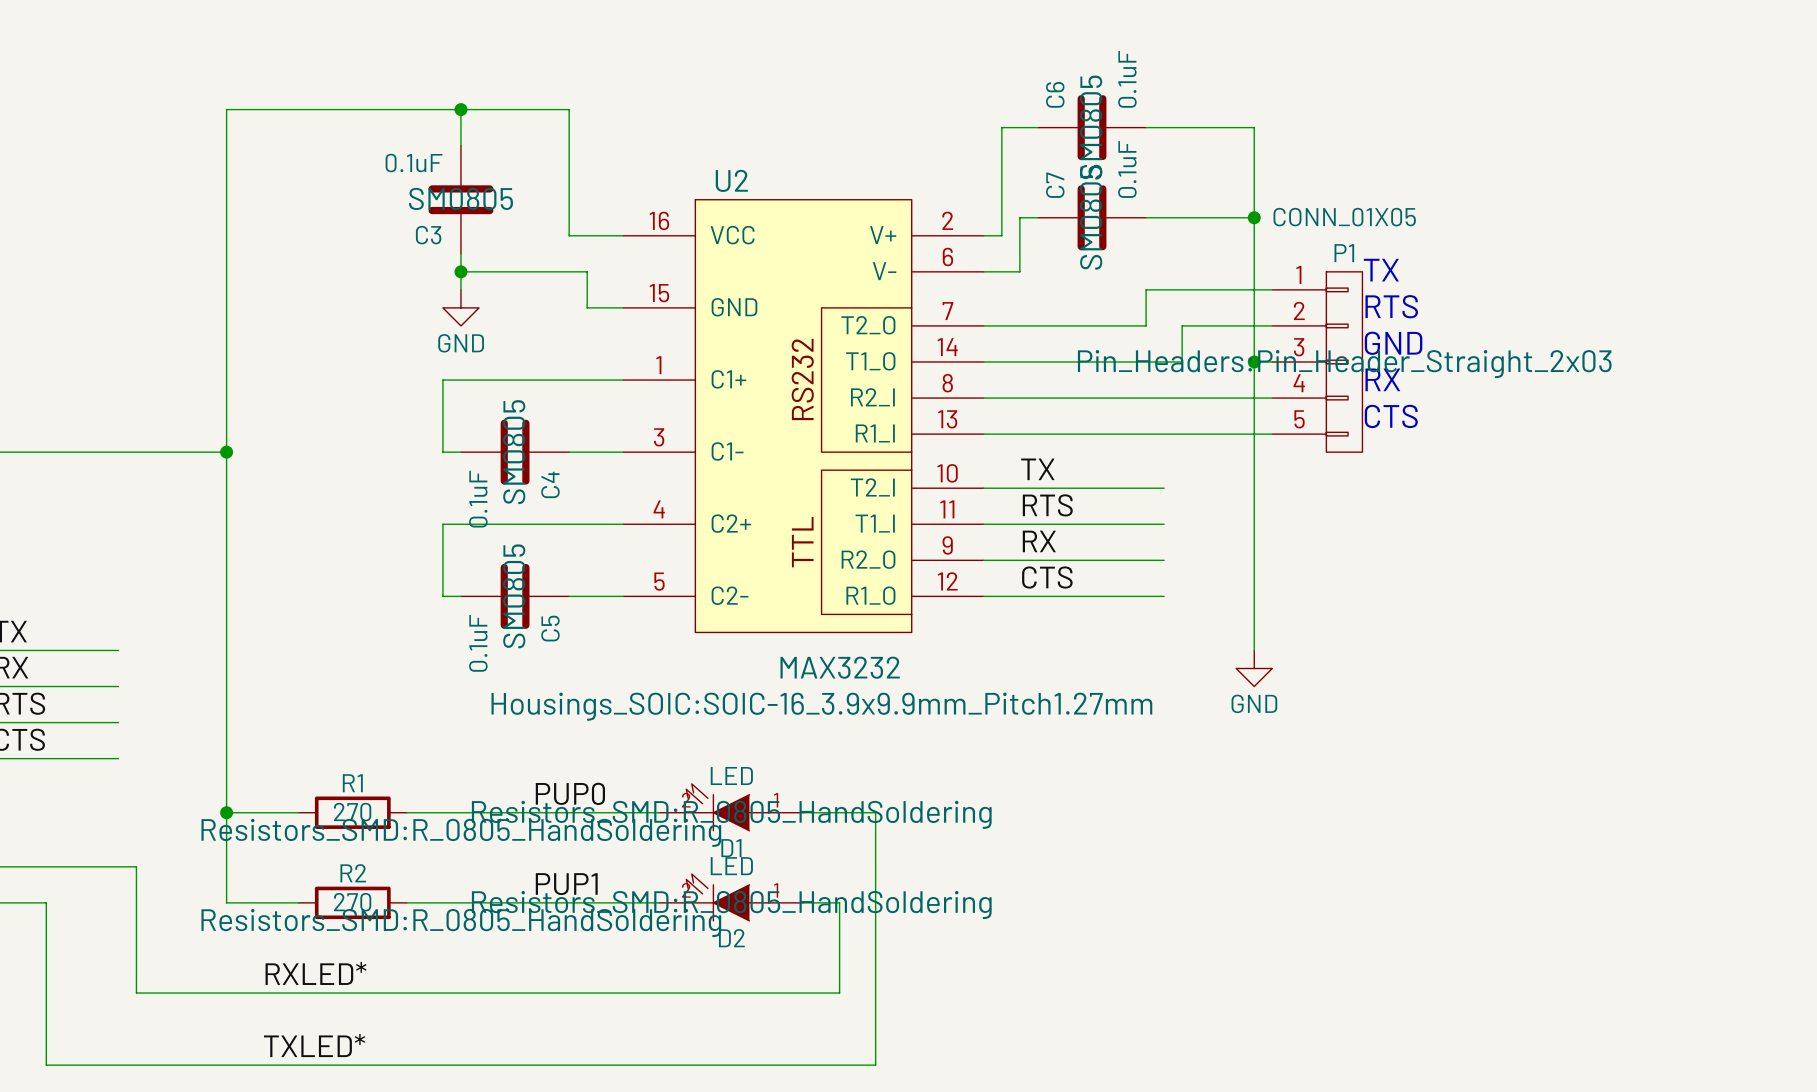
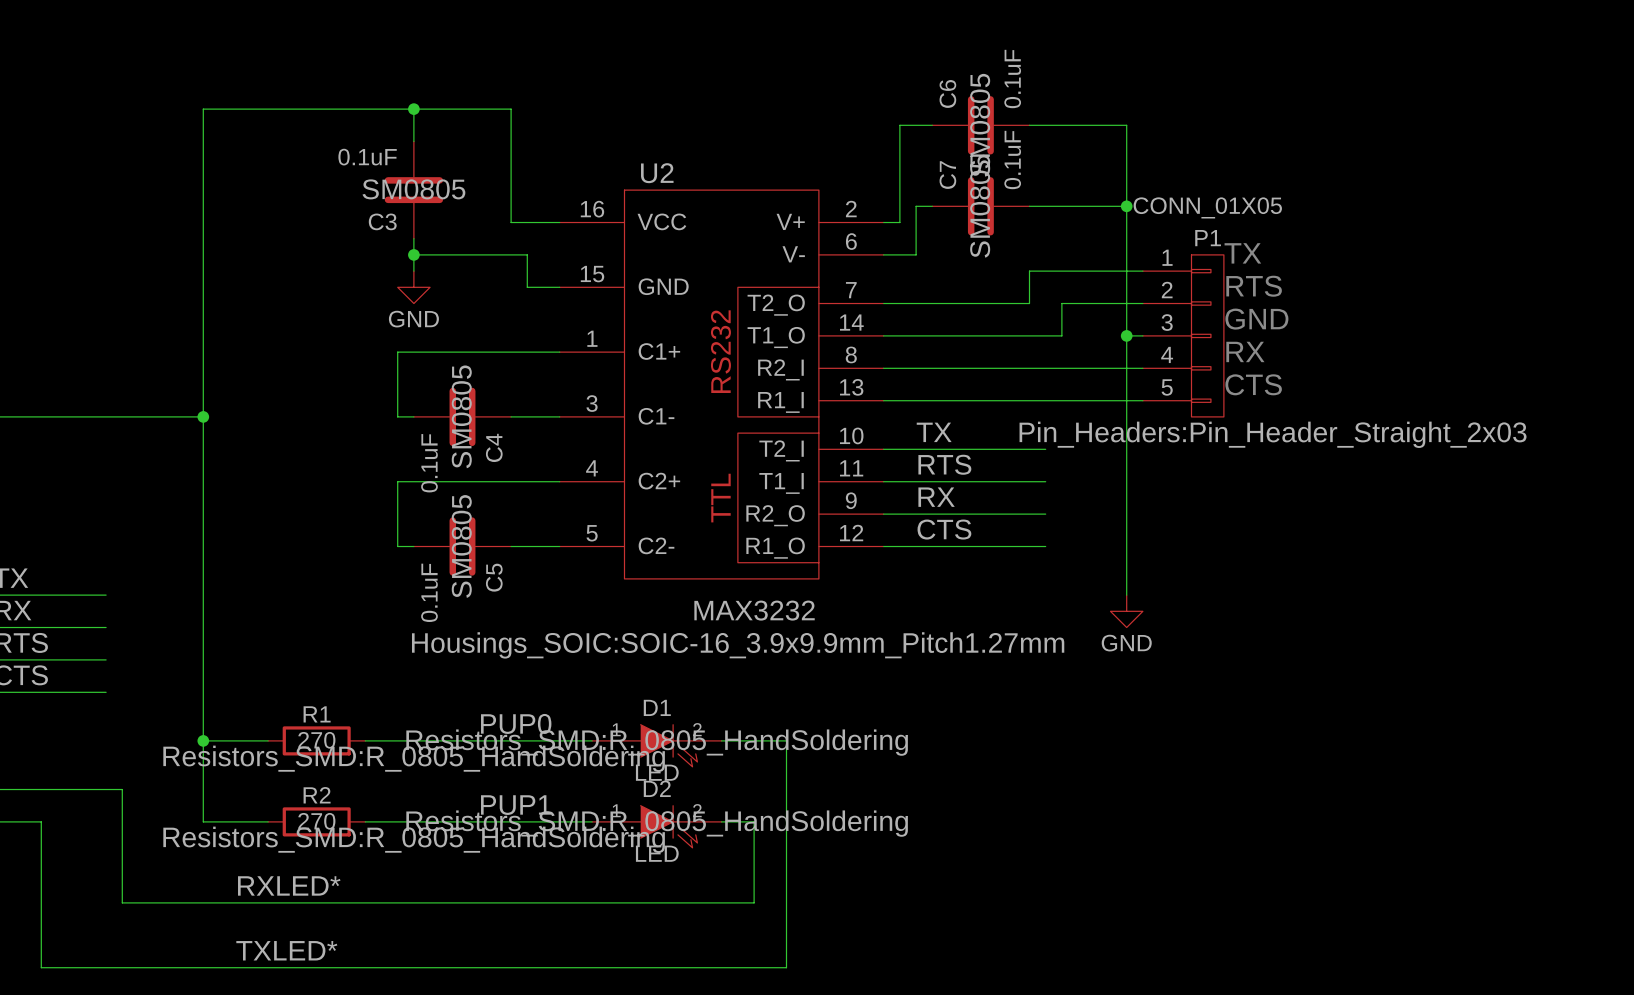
P1 text position: Pin_Headers:Pin_Header_Straight_2x03 (1344, 364) -> Pin_Headers:Pin_Header_Straight_2x03 (1273, 434)
D1 rotation: 0° (717, 807) -> 180° (669, 745)
D2 rotation: 0° (717, 897) -> 180° (669, 826)

